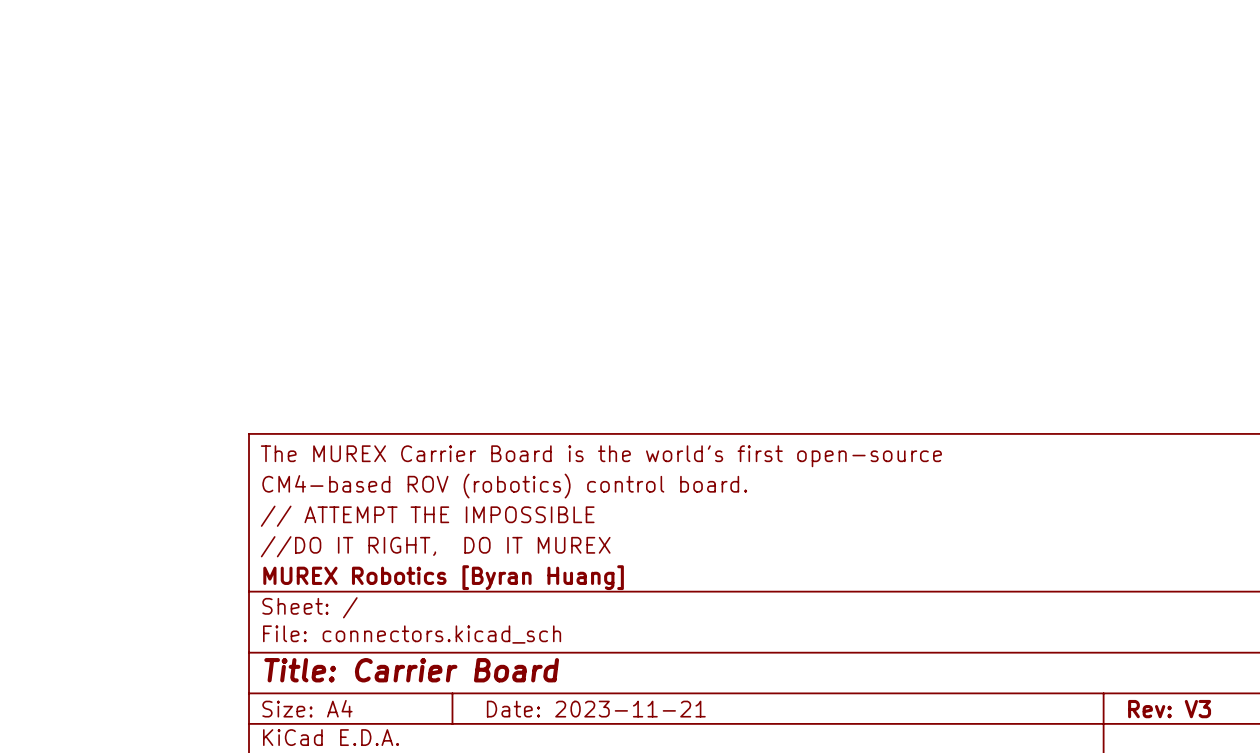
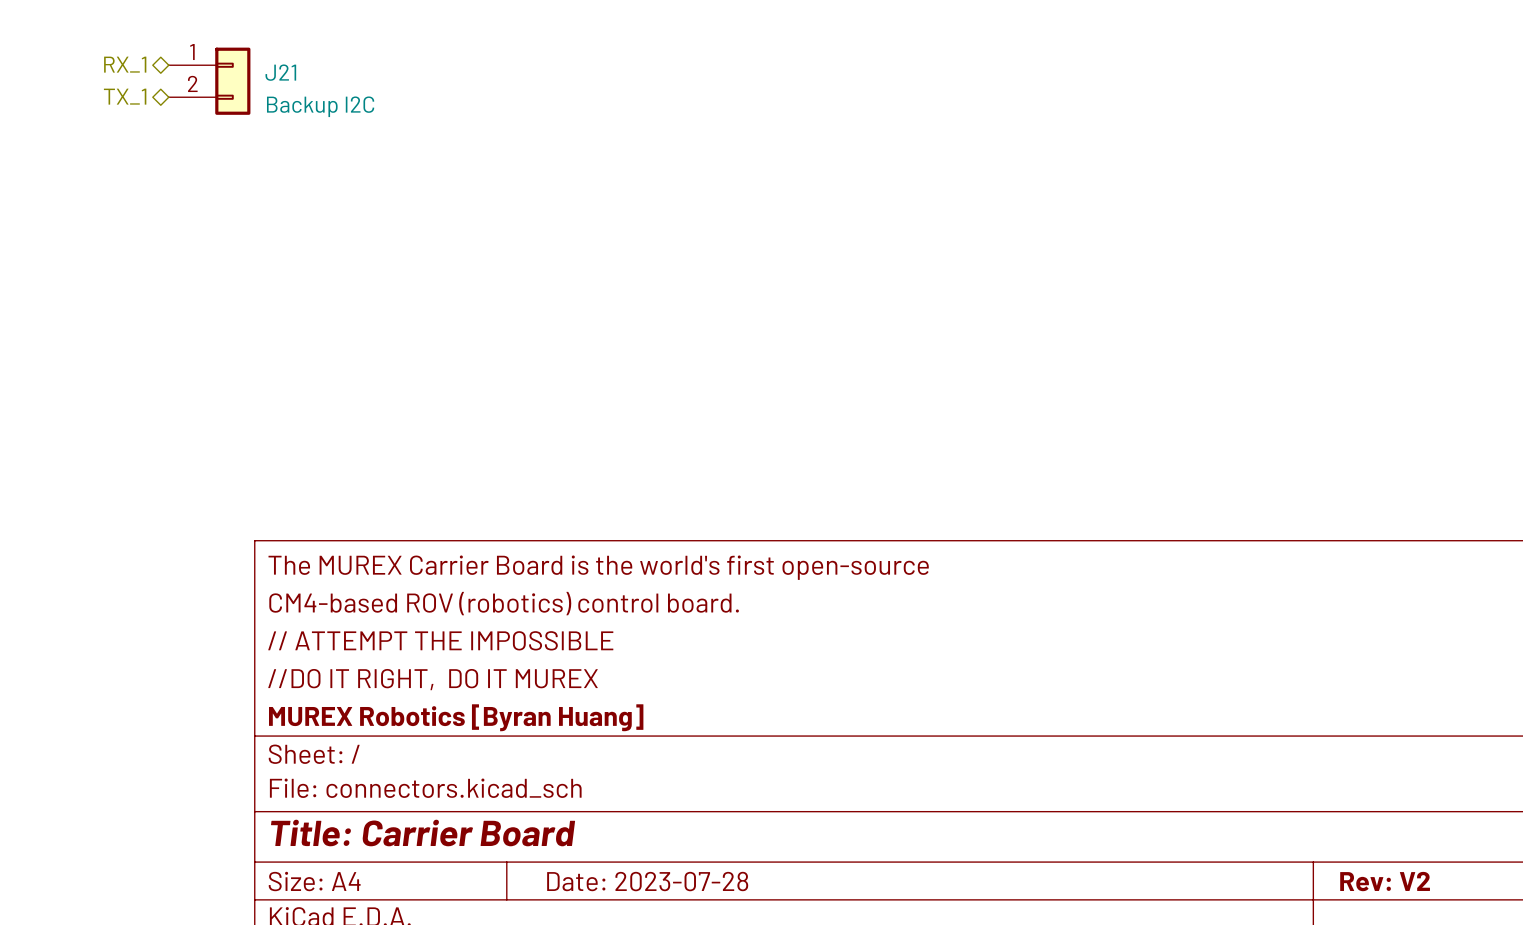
hierarchical label: none -> RX_1 (125, 64)
J21: none -> Backup I2C (209, 81)
hierarchical label: none -> TX_1 (125, 96)
title block: Date: 2023-11-21 (596, 709) -> Date: 2023-07-28 (647, 881)
title block: Rev: V3 (1169, 709) -> Rev: V2 (1385, 881)

